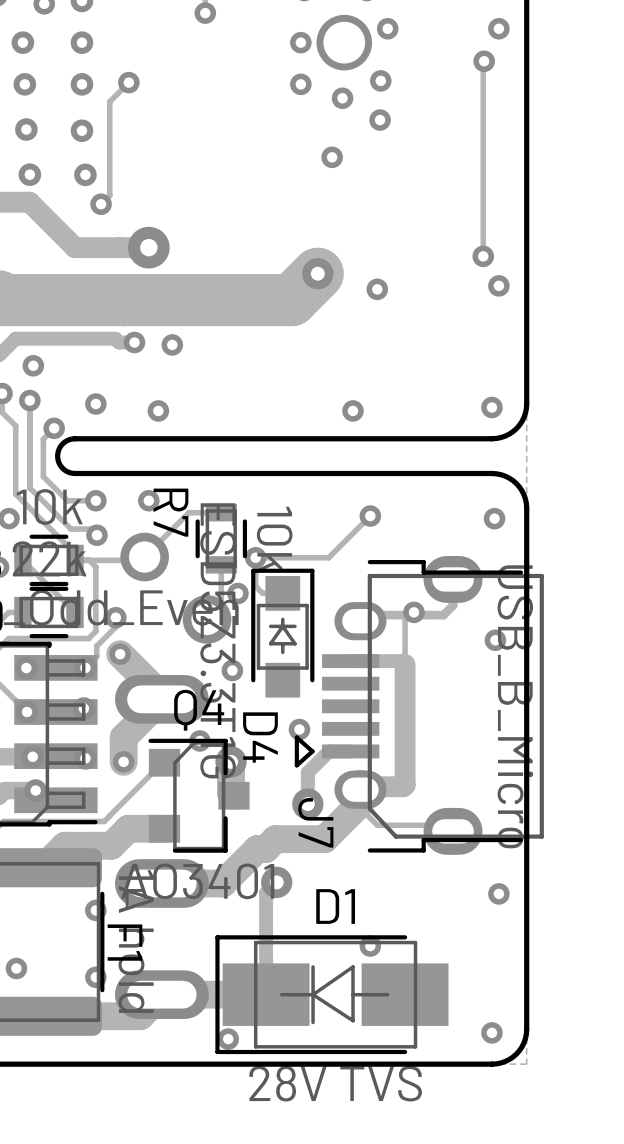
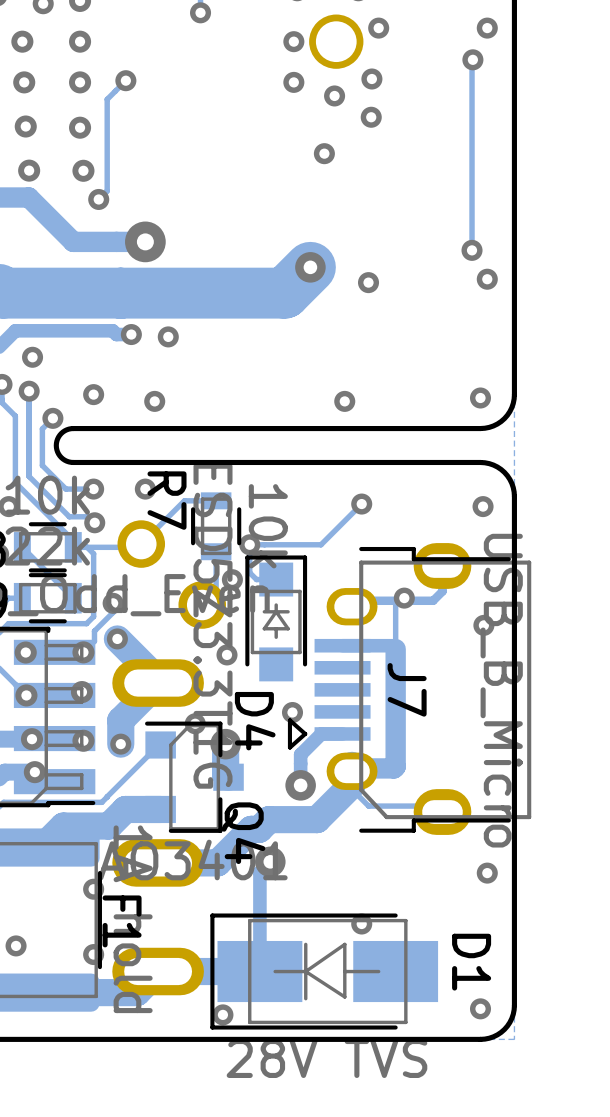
Q4 name rotation: 0° (199, 710) -> 90° clockwise (243, 833)
Q4 name position: Q4 (199, 710) -> Q4 (243, 833)
J7 name position: J7 (315, 822) -> J7 (407, 689)
D1 name rotation: 0° (335, 906) -> 90° clockwise (471, 962)
D1 name position: D1 (335, 906) -> D1 (471, 962)

